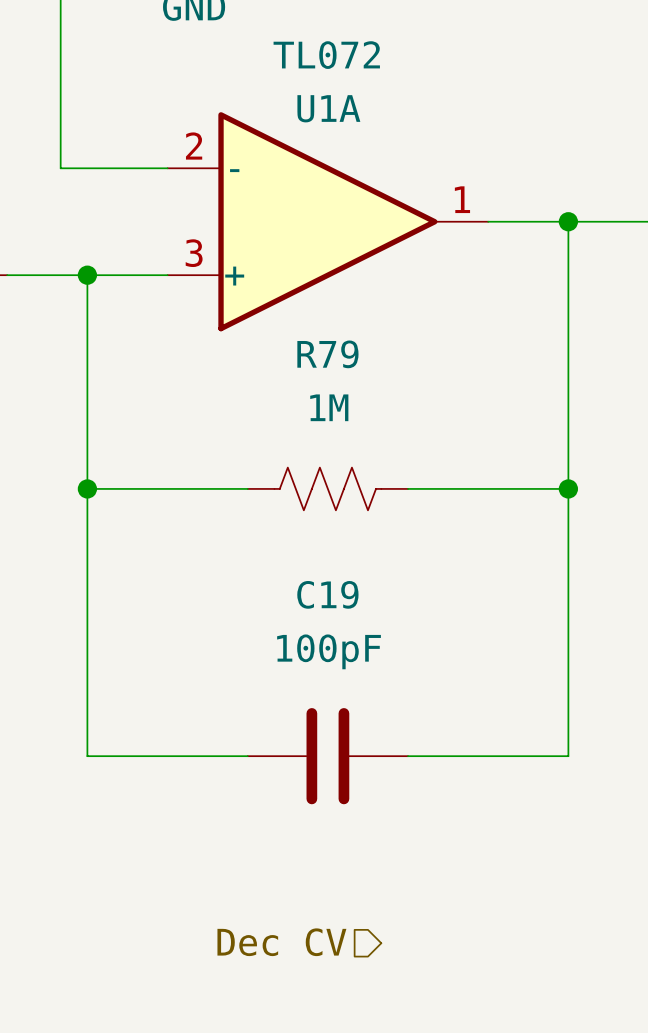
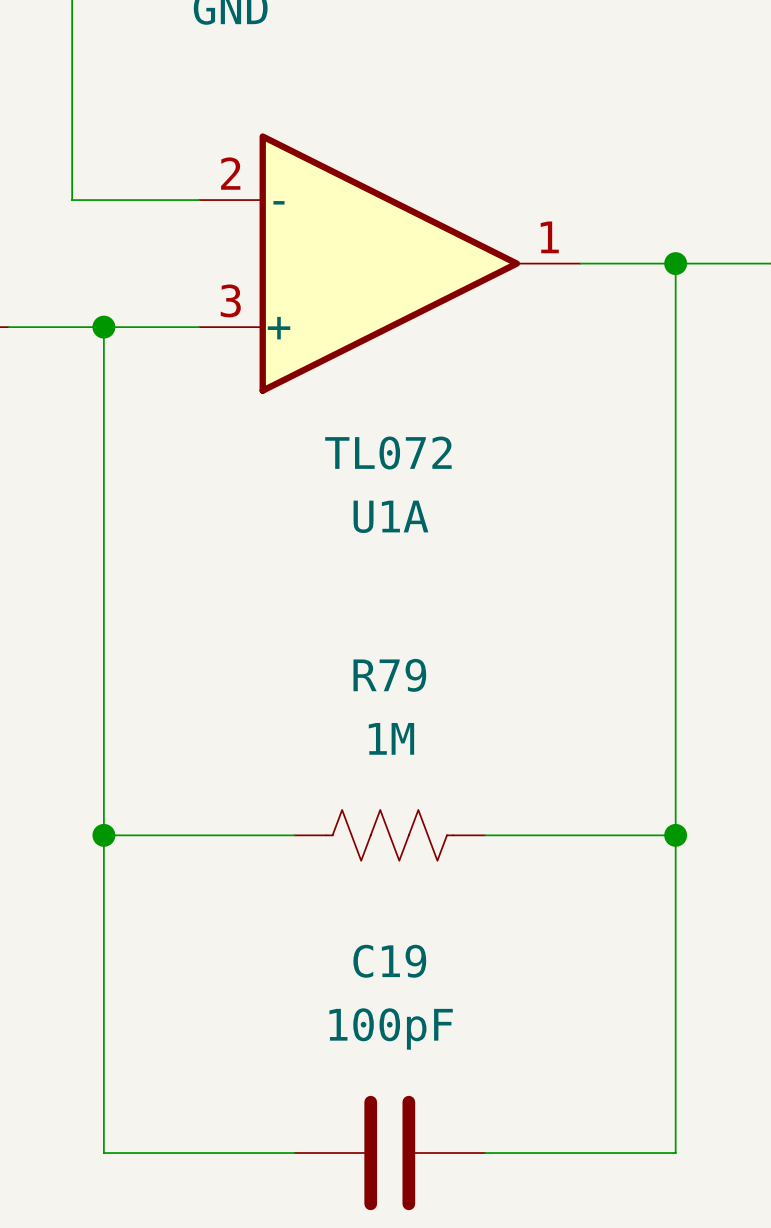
U1A value position: TL072 (326, 55) -> TL072 (388, 453)
U1A name position: U1A (328, 108) -> U1A (390, 516)
wire: (87, 488) (247, 488) -> (103, 835) (294, 835)
junction: (87, 488) -> none
R79 position: (327, 488) -> (389, 835)
wire: (408, 488) (568, 488) -> (485, 835) (675, 835)
junction: (568, 488) -> none
junction: none -> (103, 835)
junction: none -> (675, 835)
wire: (87, 756) (247, 756) -> (103, 898) (103, 1153) (294, 1153)
C19 position: (327, 756) -> (389, 1153)
wire: (408, 756) (568, 756) -> (485, 1153) (675, 1153) (675, 898)
hierarchical label: Dec CV (281, 942) -> none

